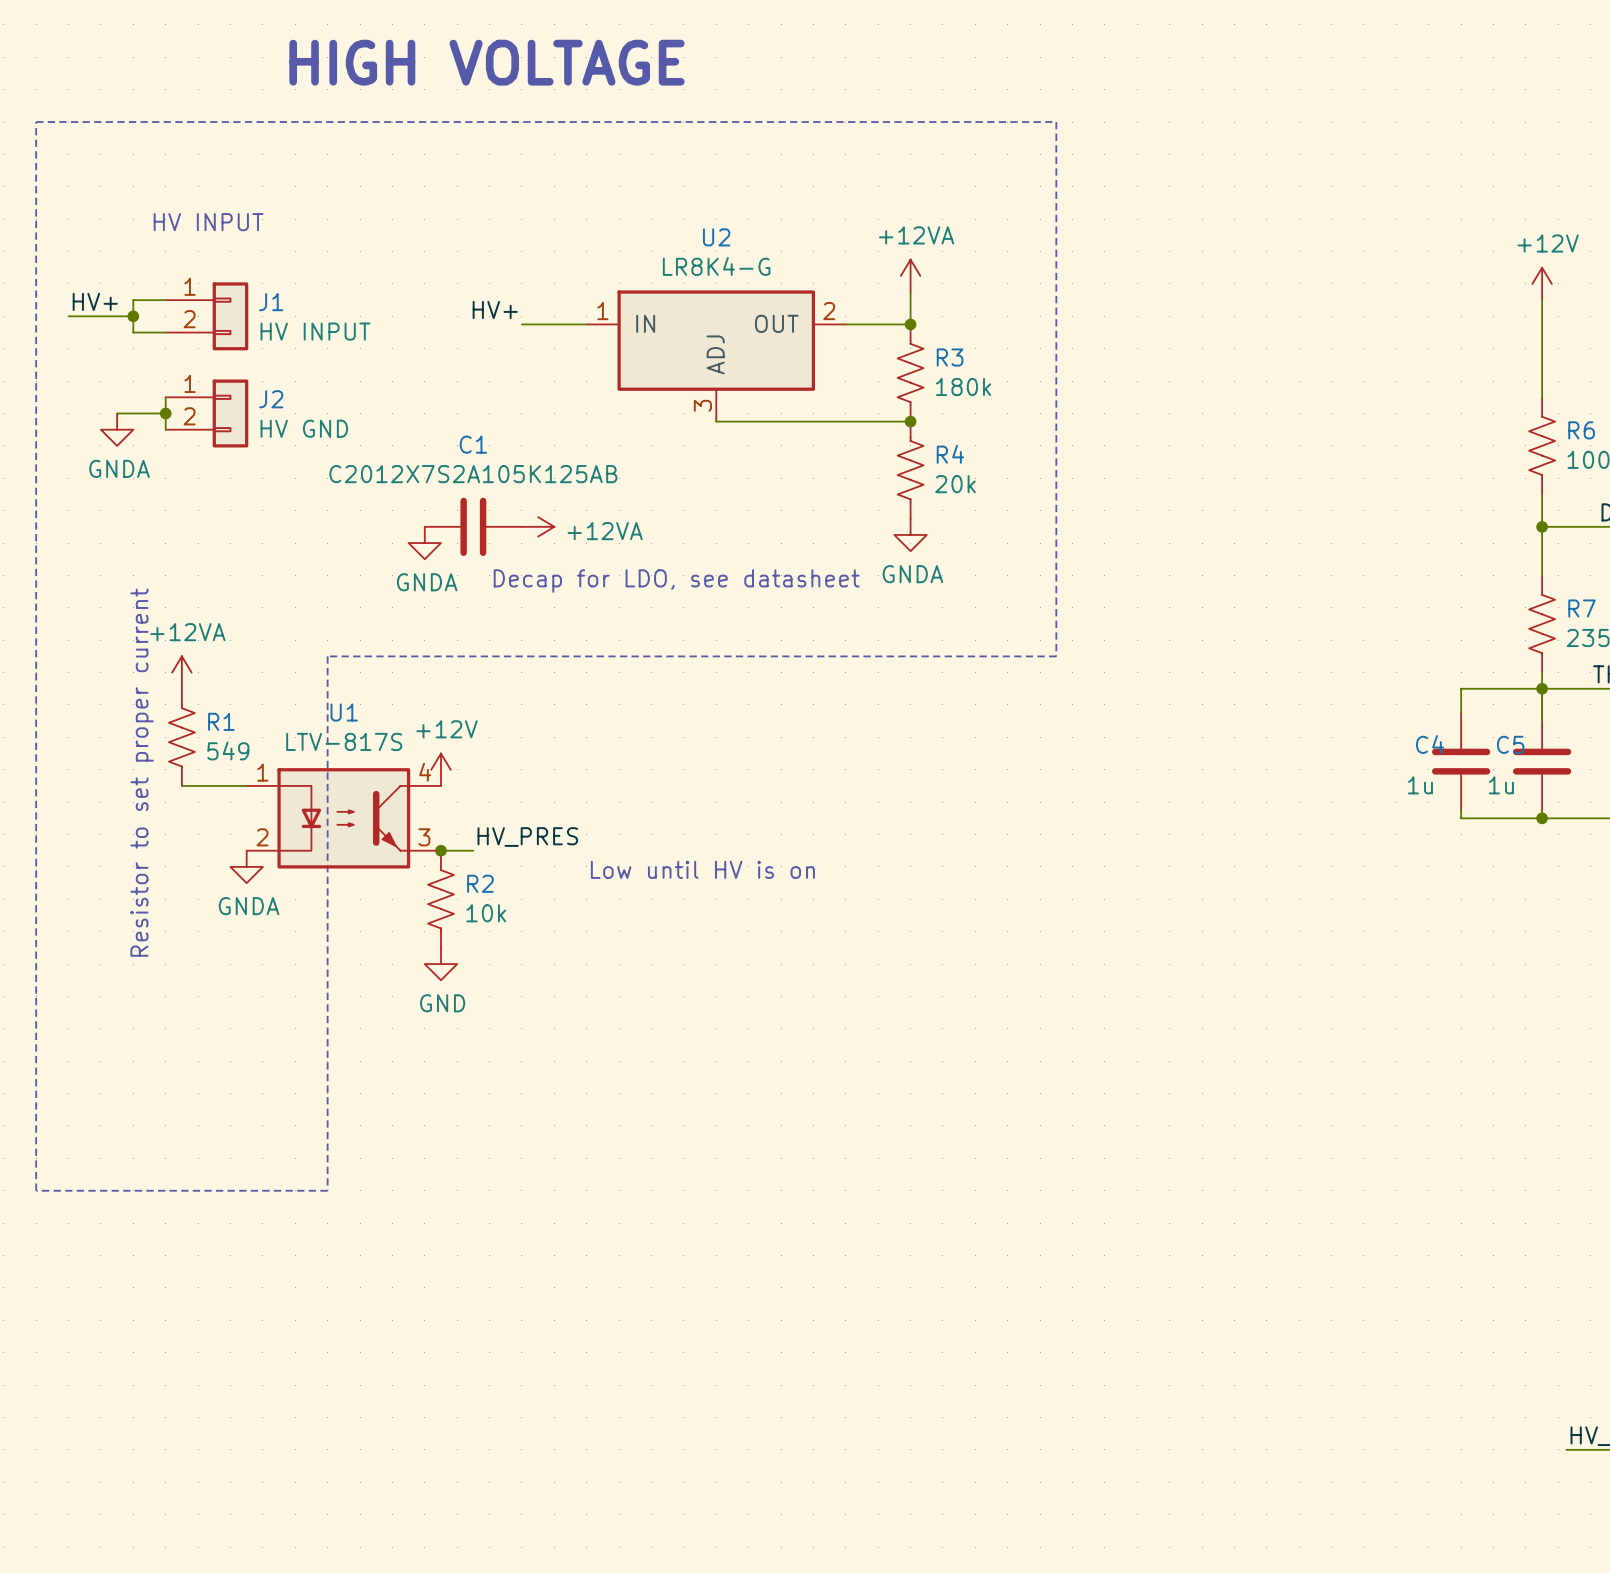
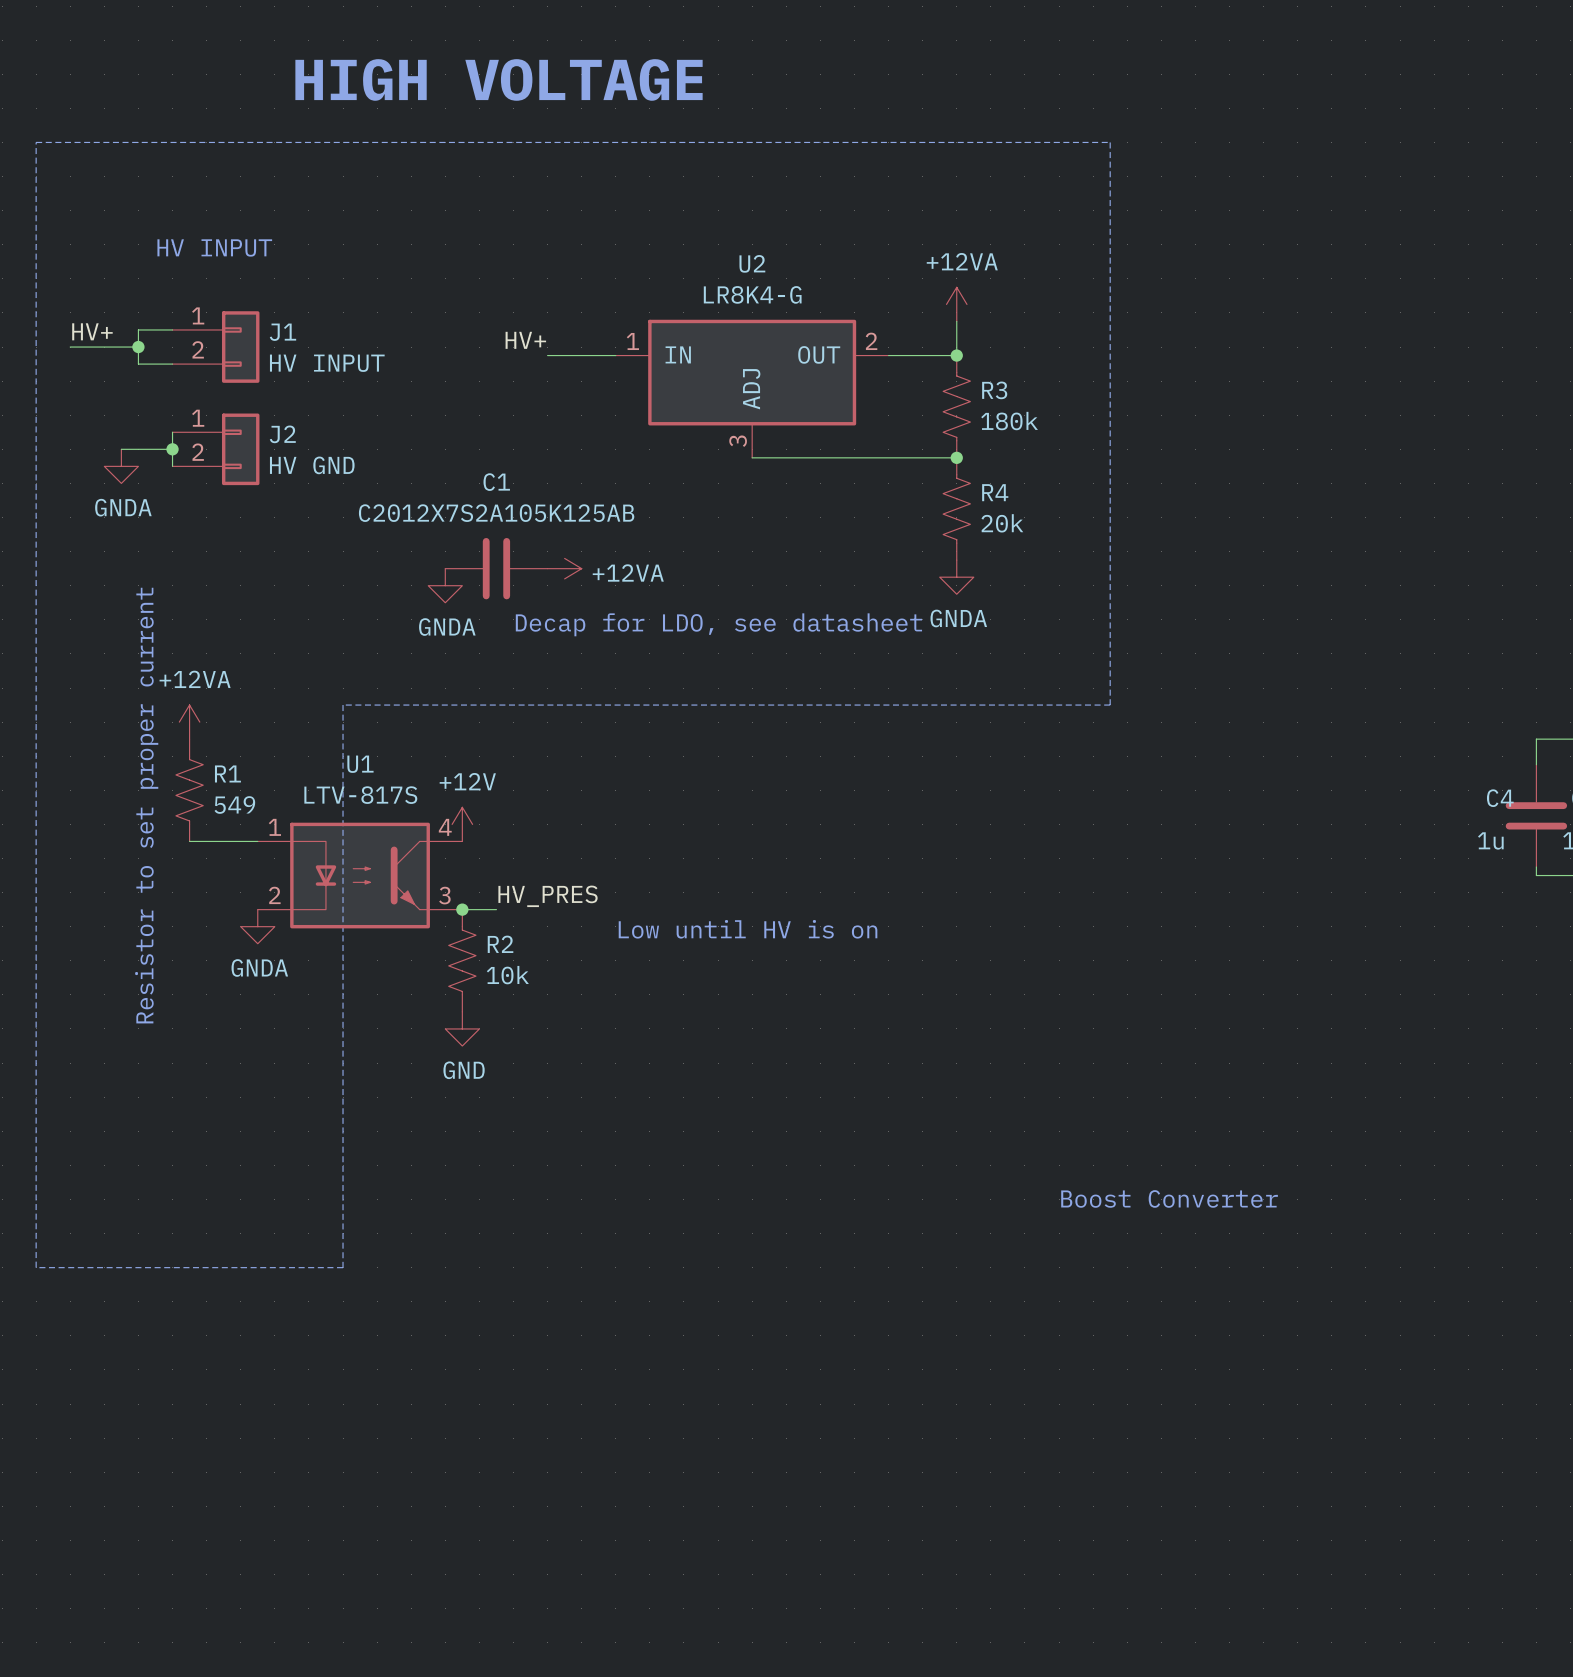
text: none -> Boost Converter (1169, 1198)

